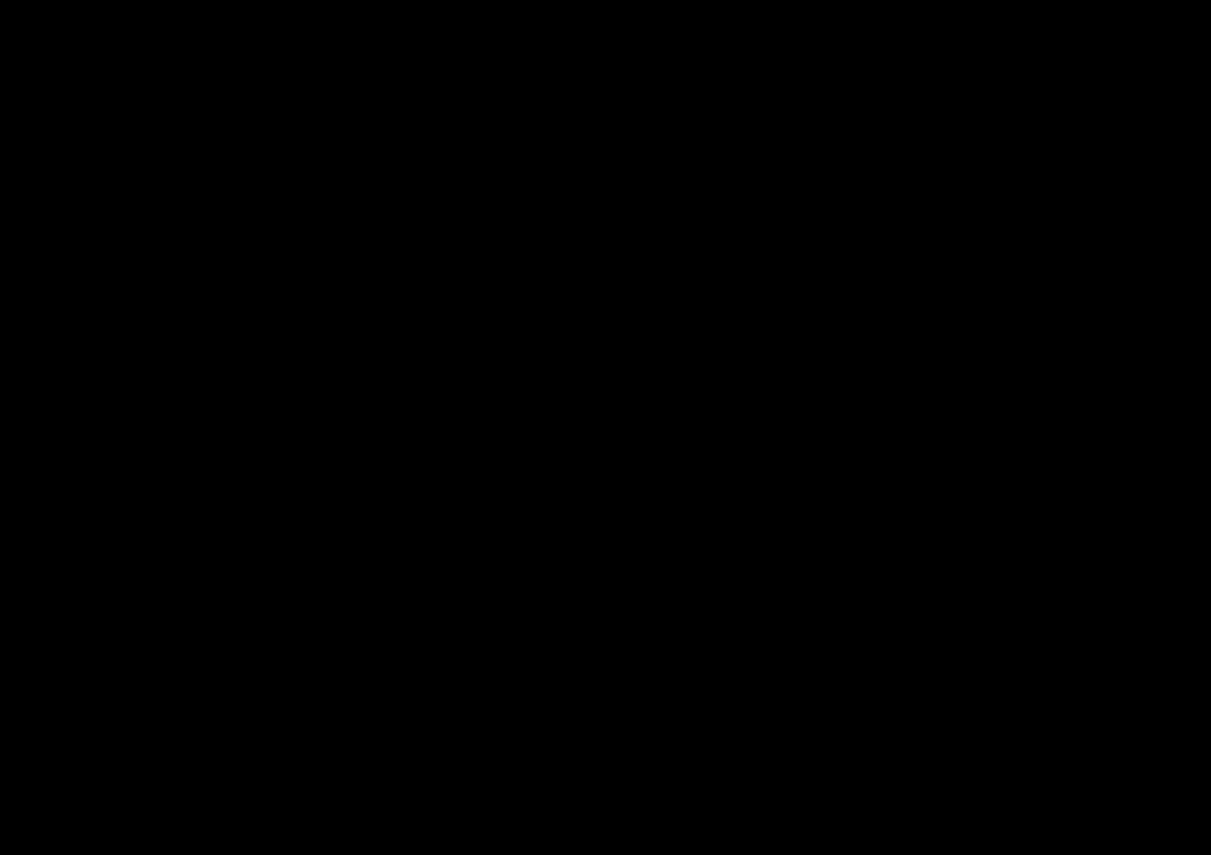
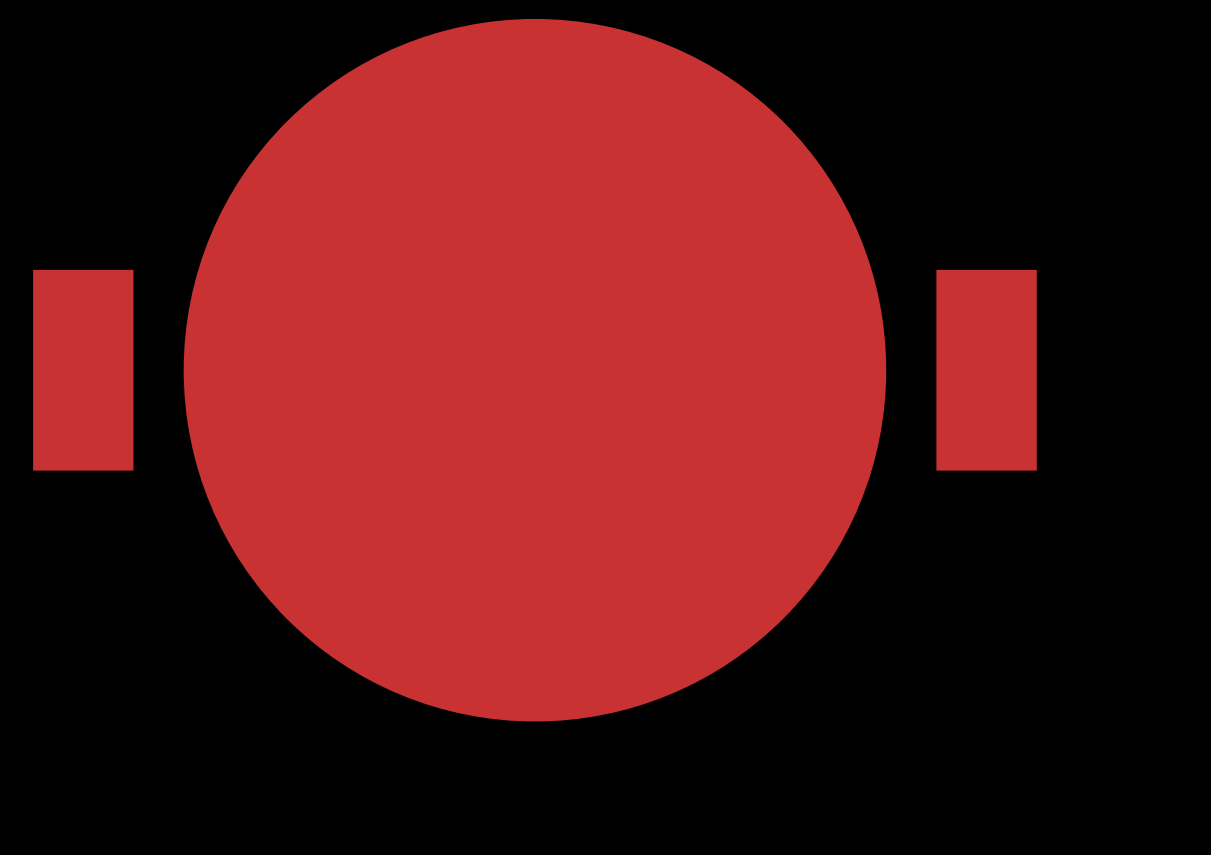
part: none -> (534, 370)

